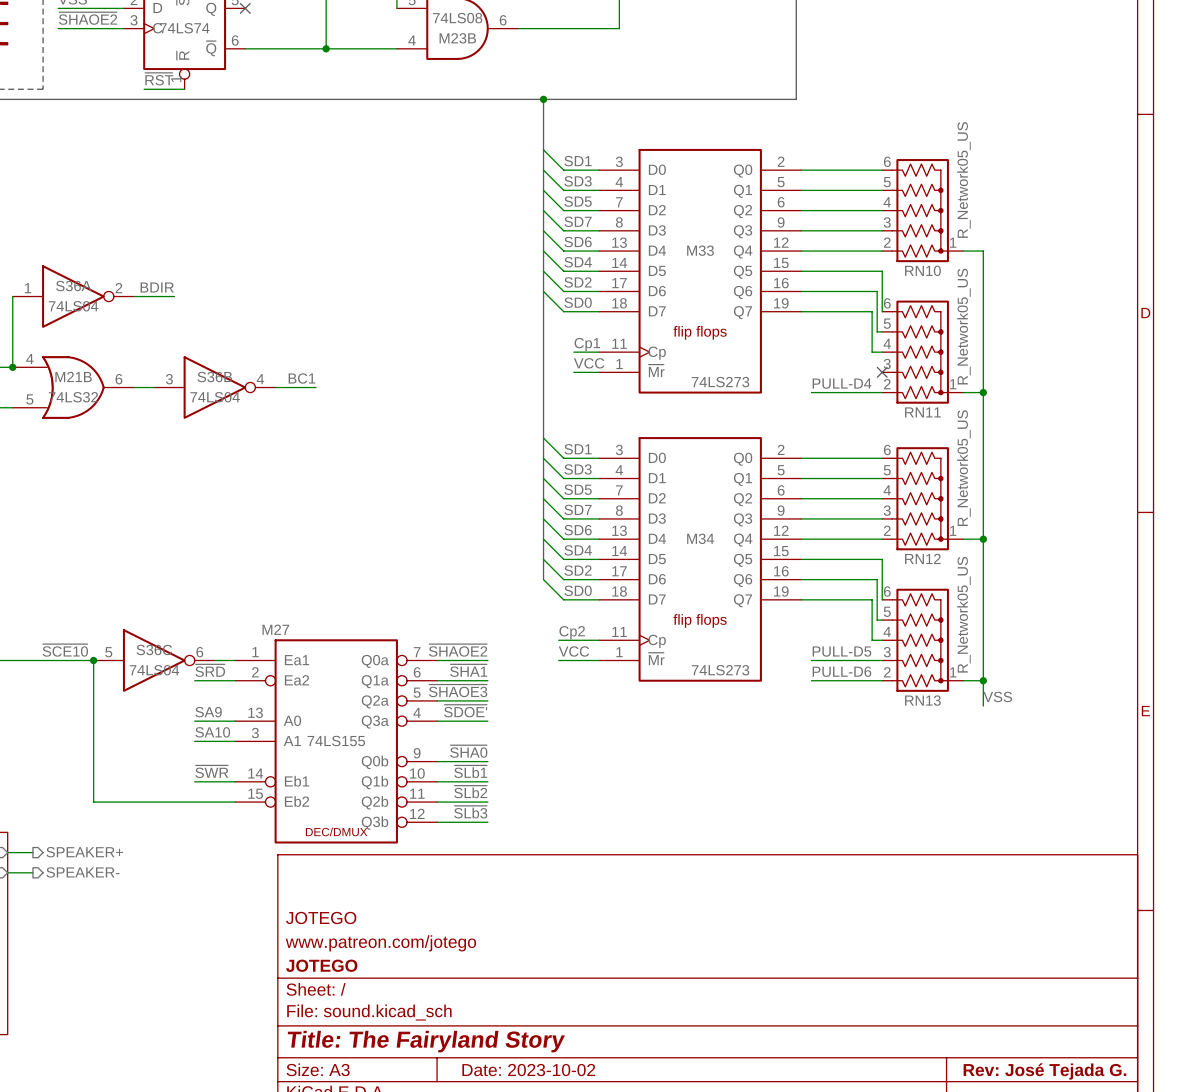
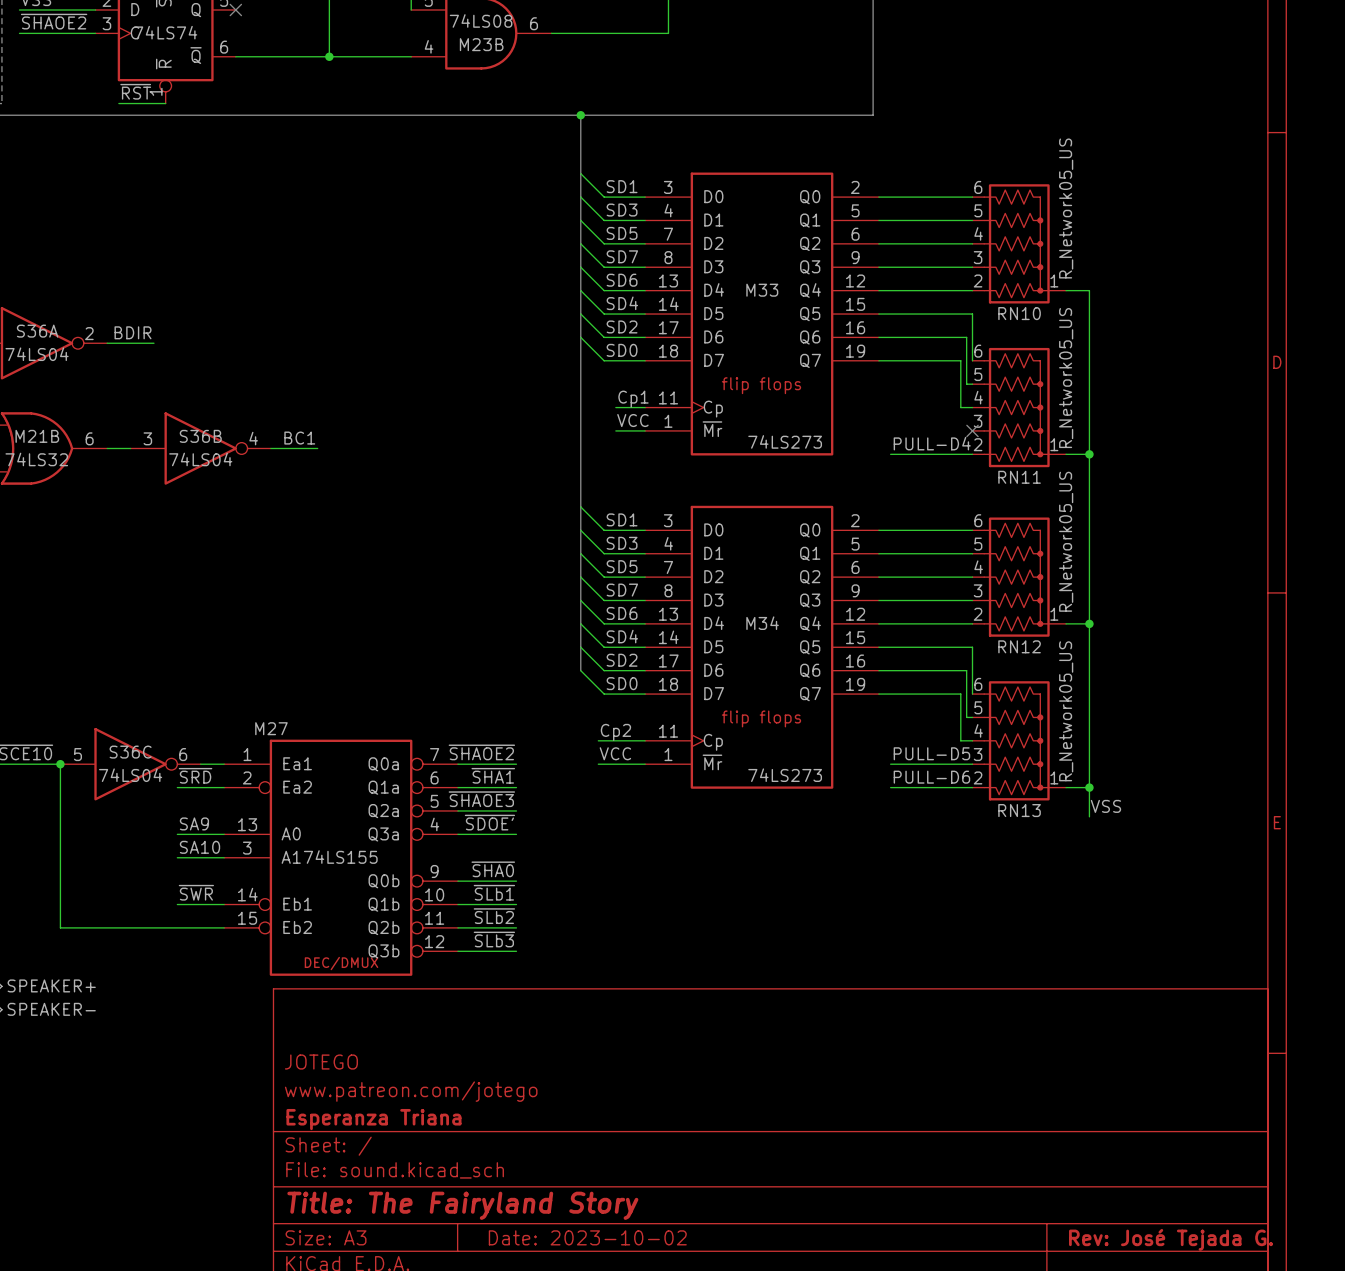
title block: JOTEGO (321, 965) -> Esperanza Triana (373, 1119)

